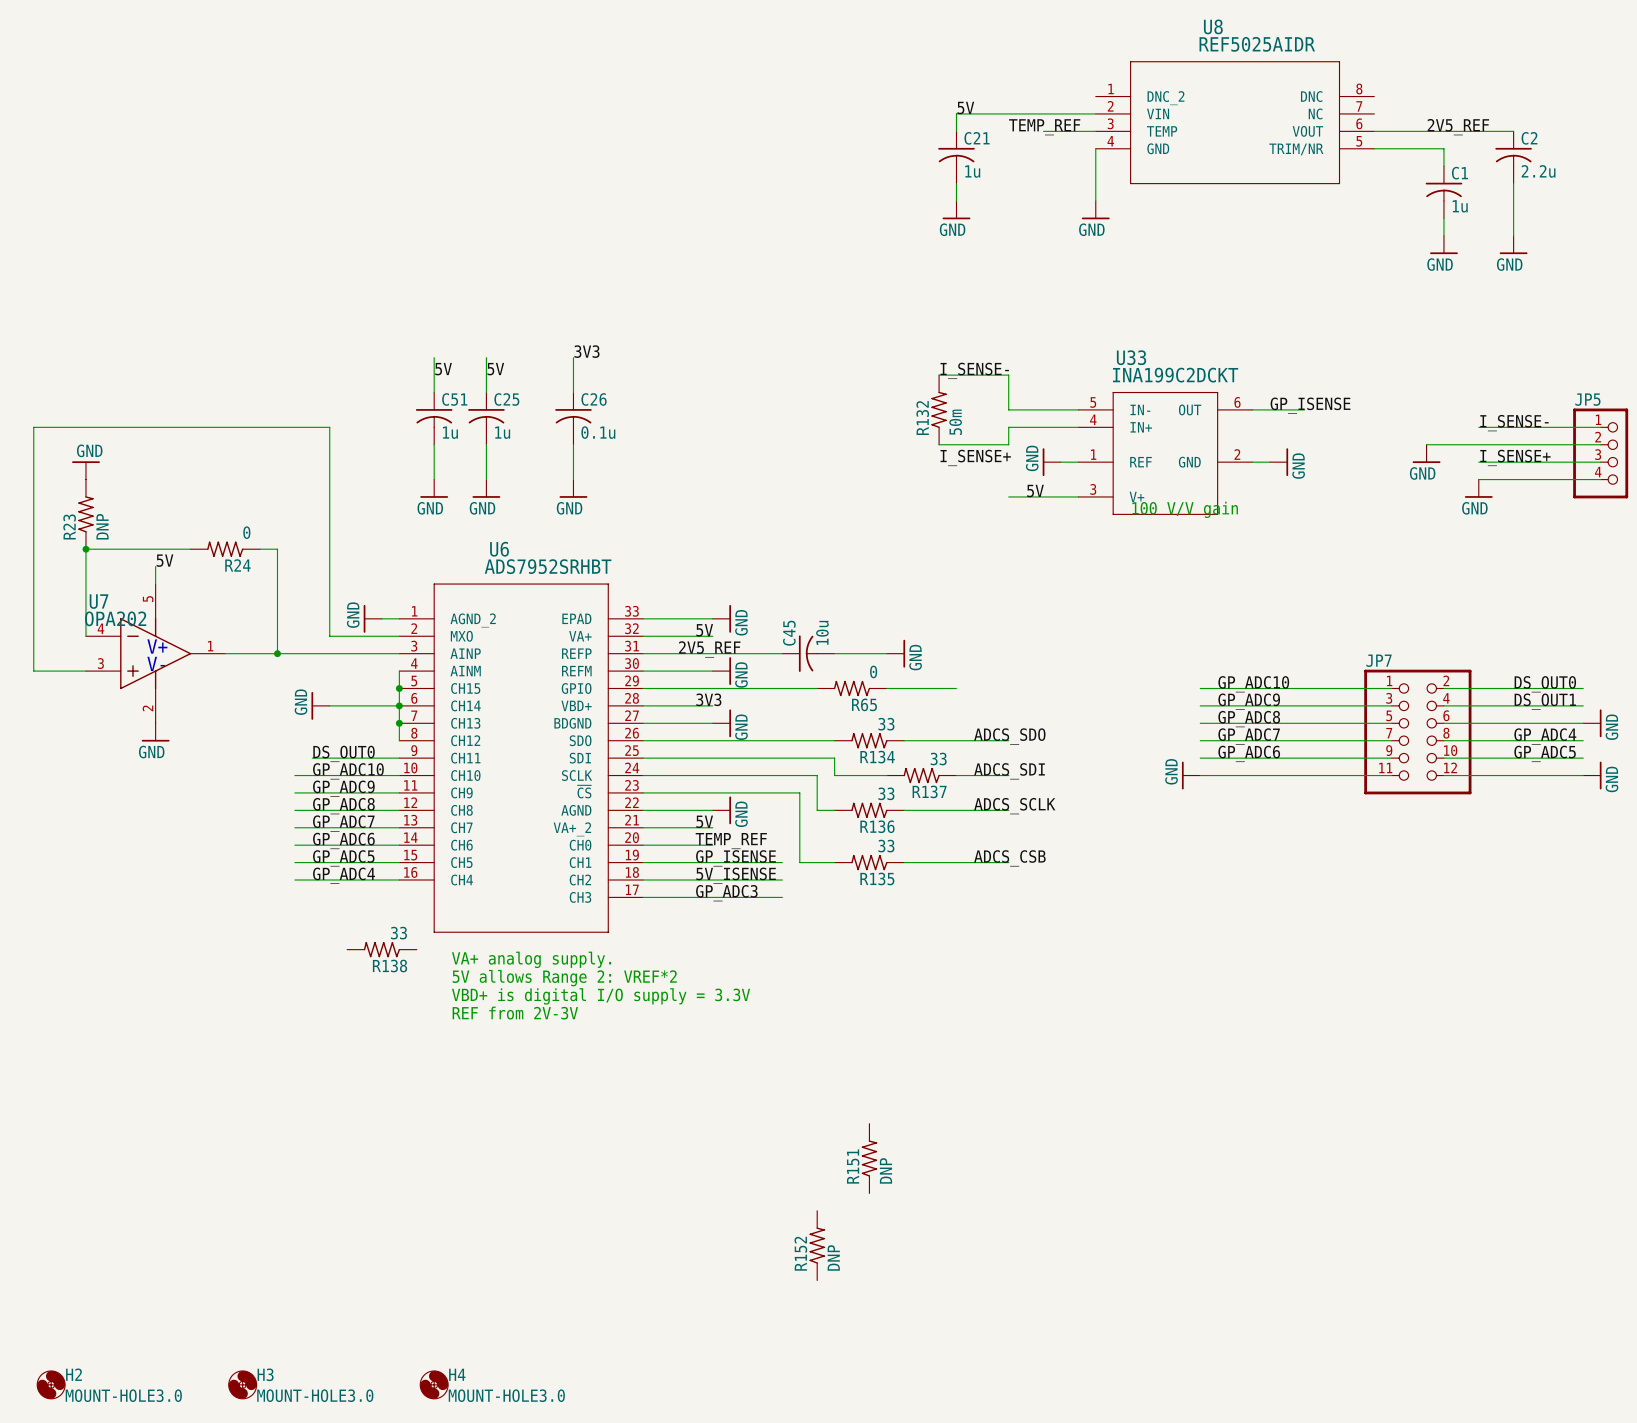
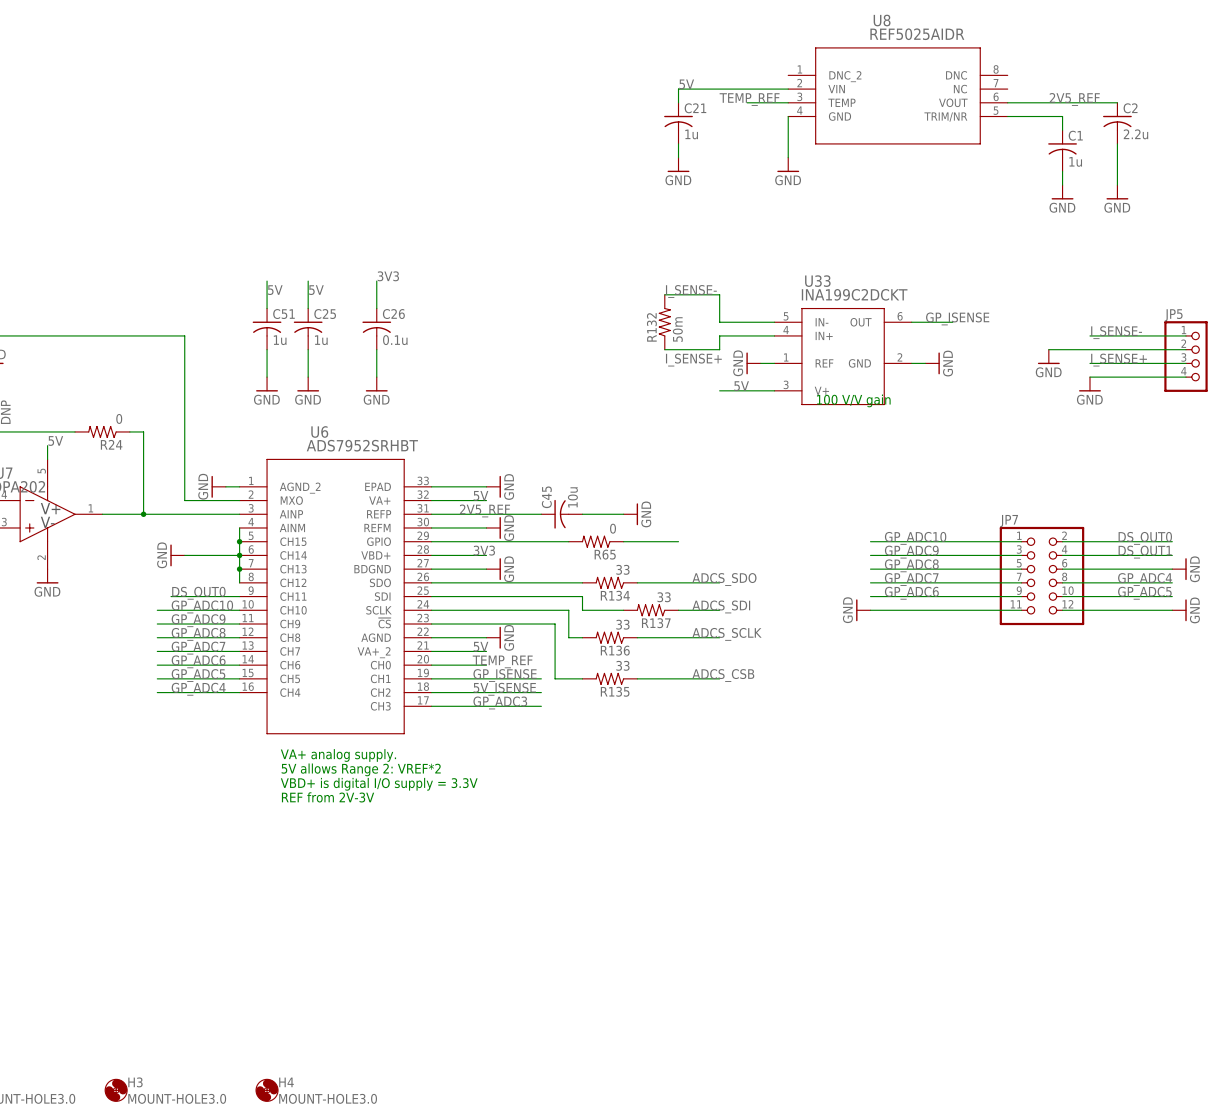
R138: 33 (381, 949) -> none
R151: DNP (869, 1158) -> none
R152: DNP (817, 1245) -> none

